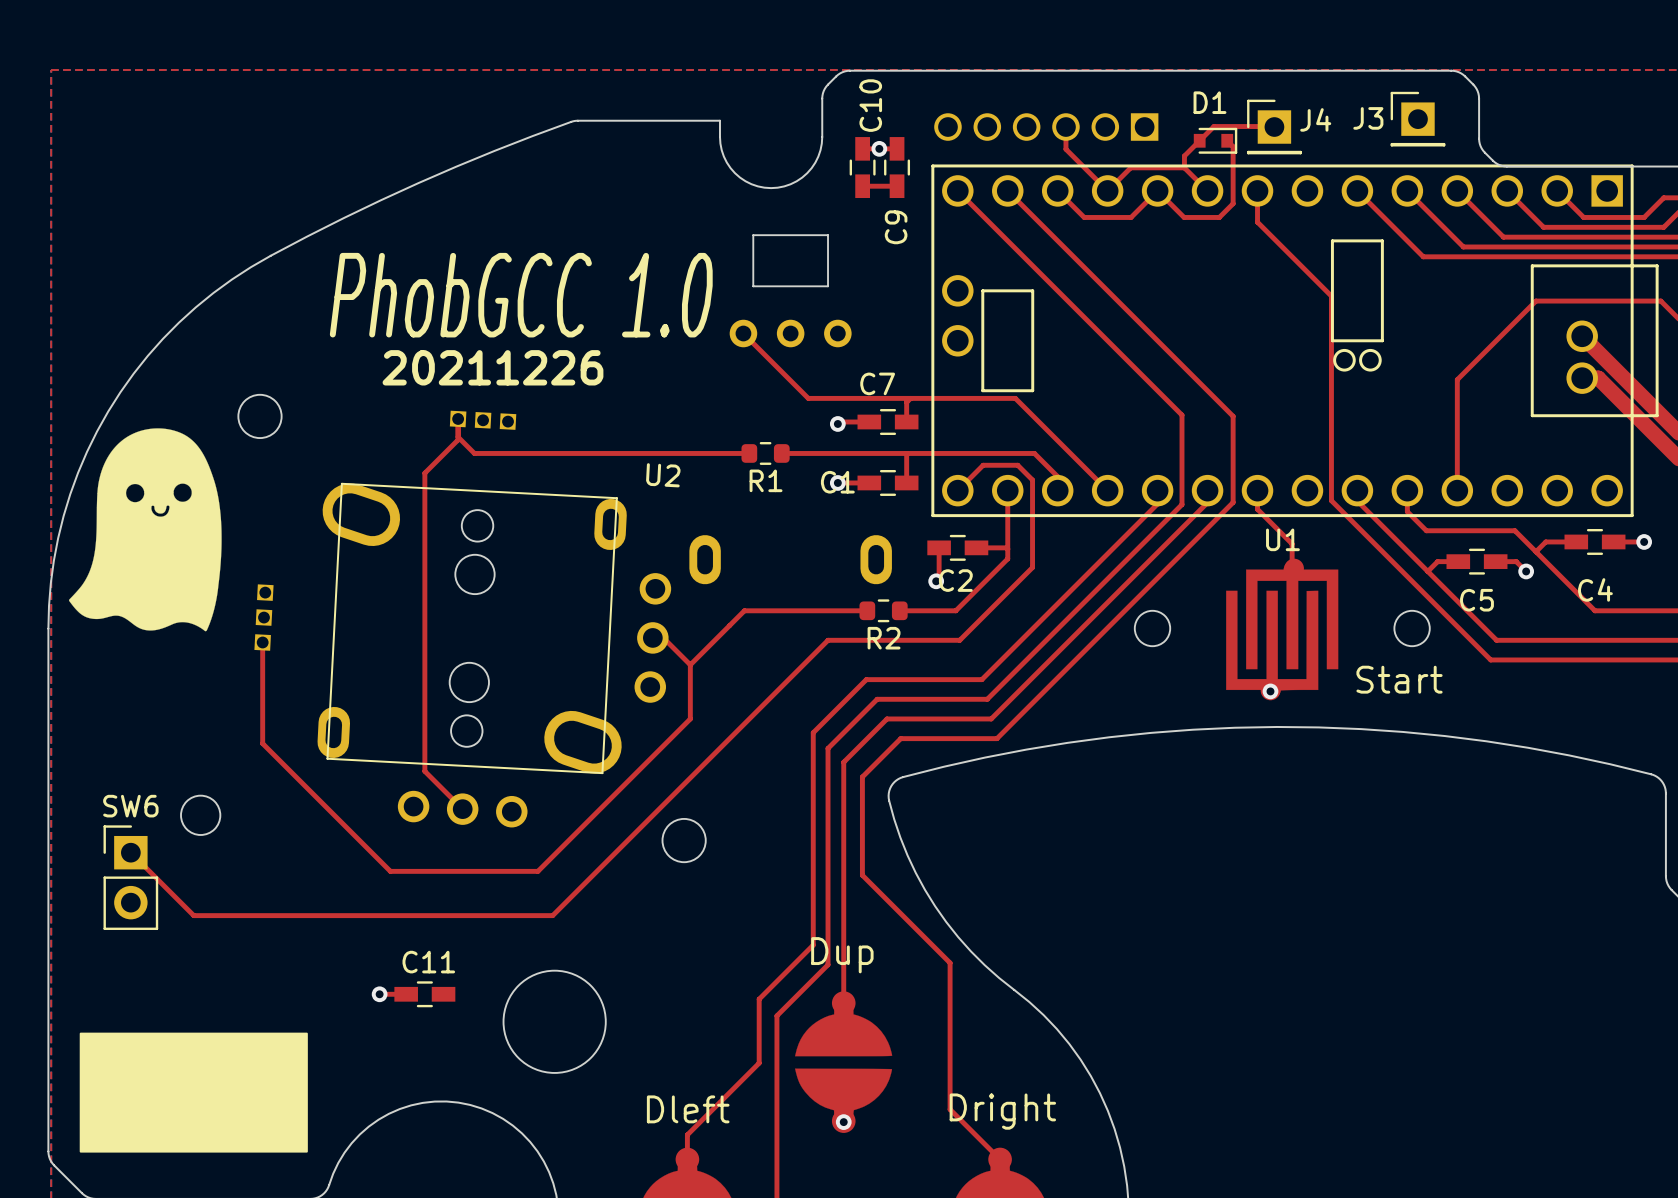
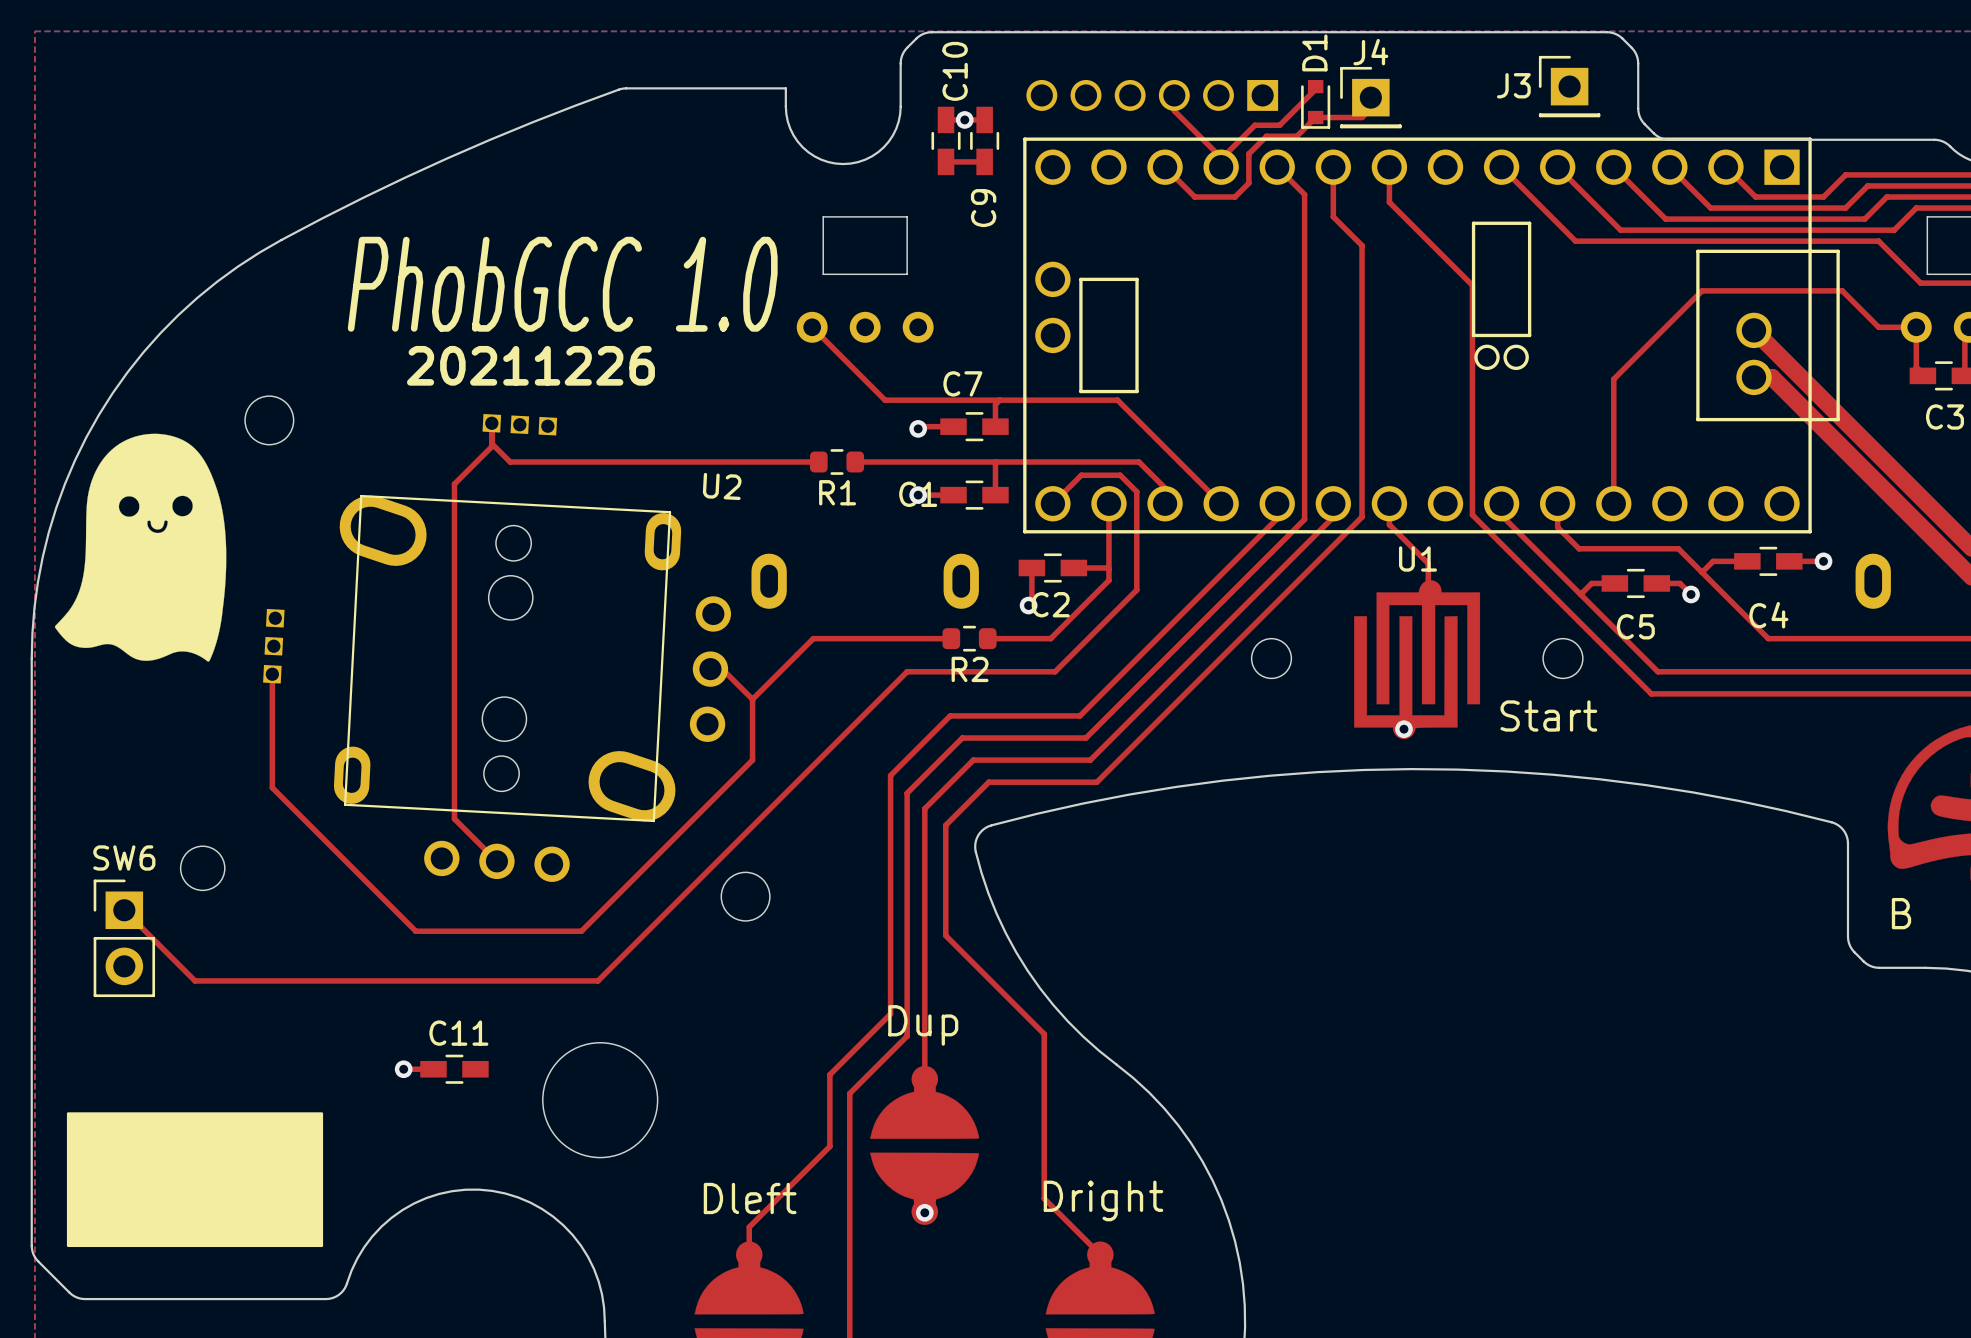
top track: none -> (1315, 86) (1315, 89) (1279, 125) (1254, 125) (1221, 159)
J4 name position: J4 (1315, 119) -> J4 (1370, 52)
top track: (1270, 127) (1213, 126) (1184, 156) (1184, 167) -> none
J4 position: (1274, 127) -> (1370, 97)
top track: (1065, 140) (1065, 149) (1107, 190) (1130, 167) (1184, 167) -> (1174, 110) (1221, 157) (1221, 167)
D1 rotation: 0° (1215, 140) -> 90° clockwise (1315, 104)
top track: (1227, 140) (1233, 146) (1233, 203) (1219, 217) (1184, 217) (1182, 215) -> none
top track: (1184, 167) (1207, 190) -> none
top track: (957, 190) (1182, 415) -> (1304, 194) (1304, 418)
top track: (1007, 190) (1233, 416) -> (1333, 167) (1333, 216) (1362, 245) (1362, 420)
top track: (1157, 190) (1131, 217) (1120, 217) -> (1370, 106) (1362, 117) (1315, 117) (1296, 136) (1266, 136) (1248, 153) (1248, 183) (1235, 197)

